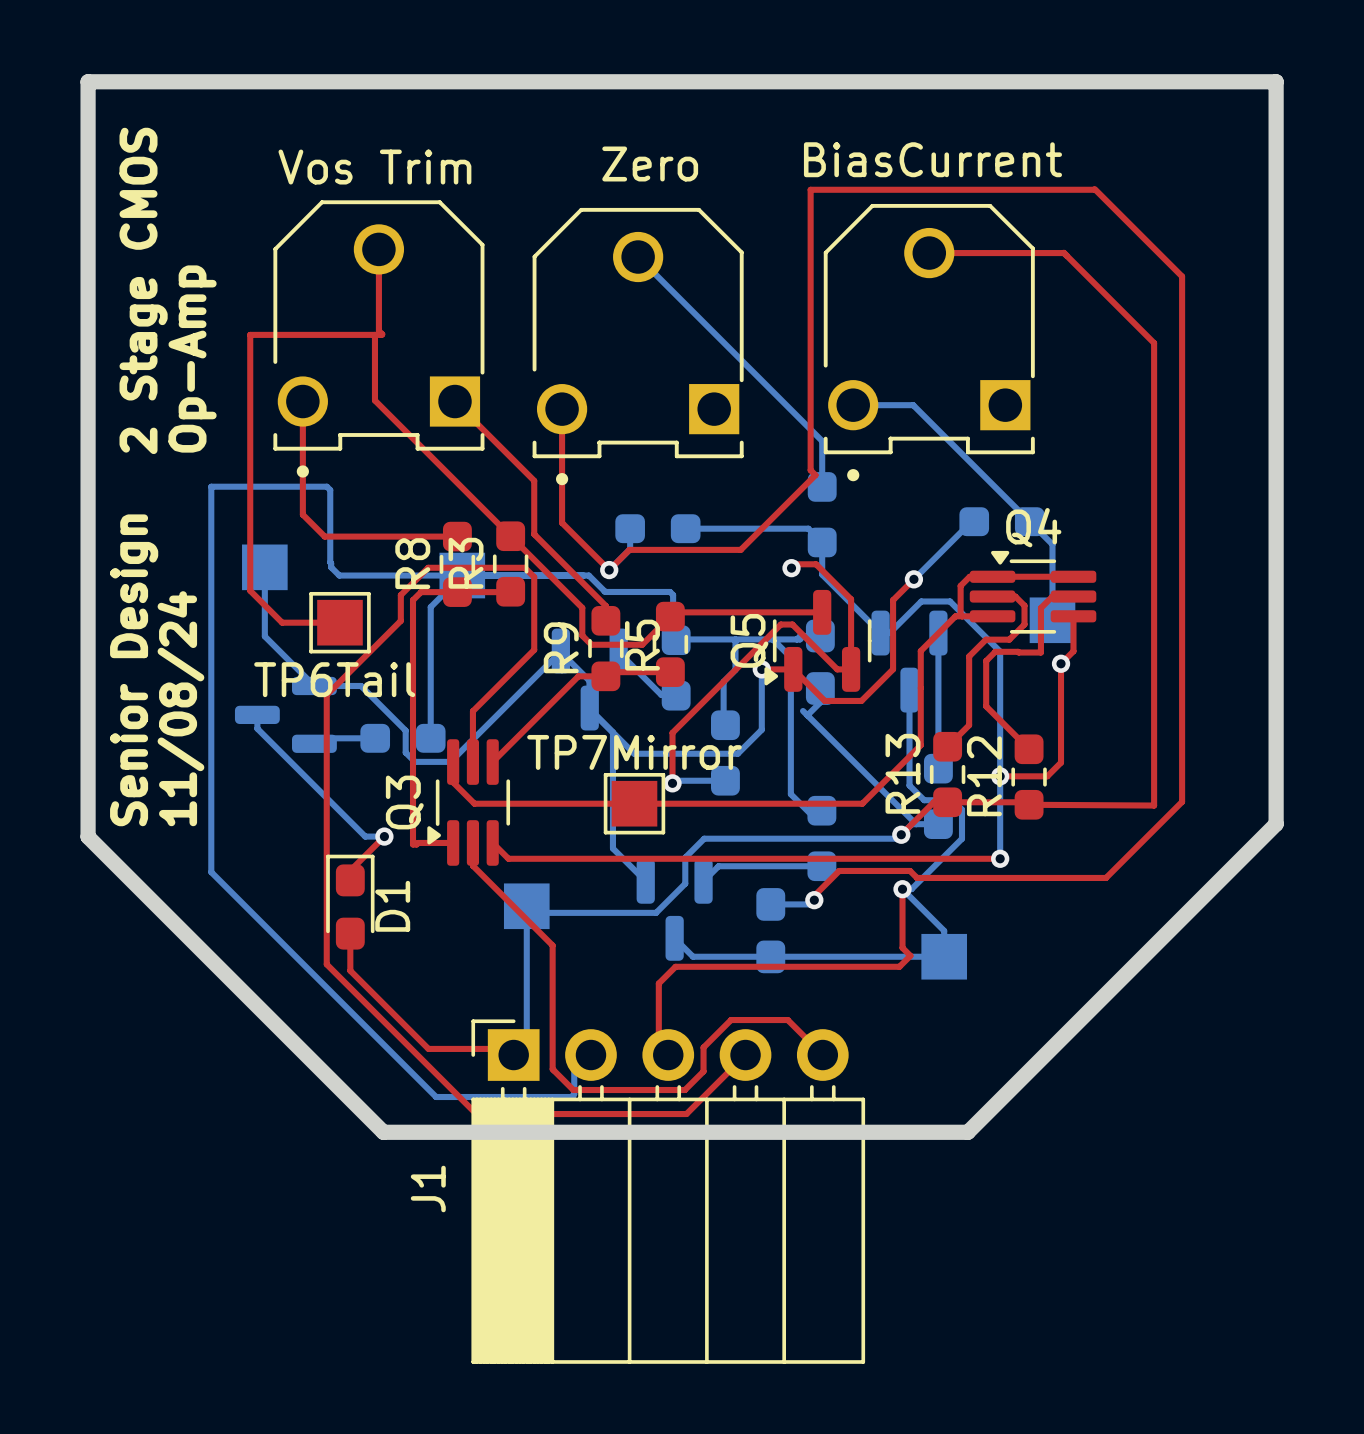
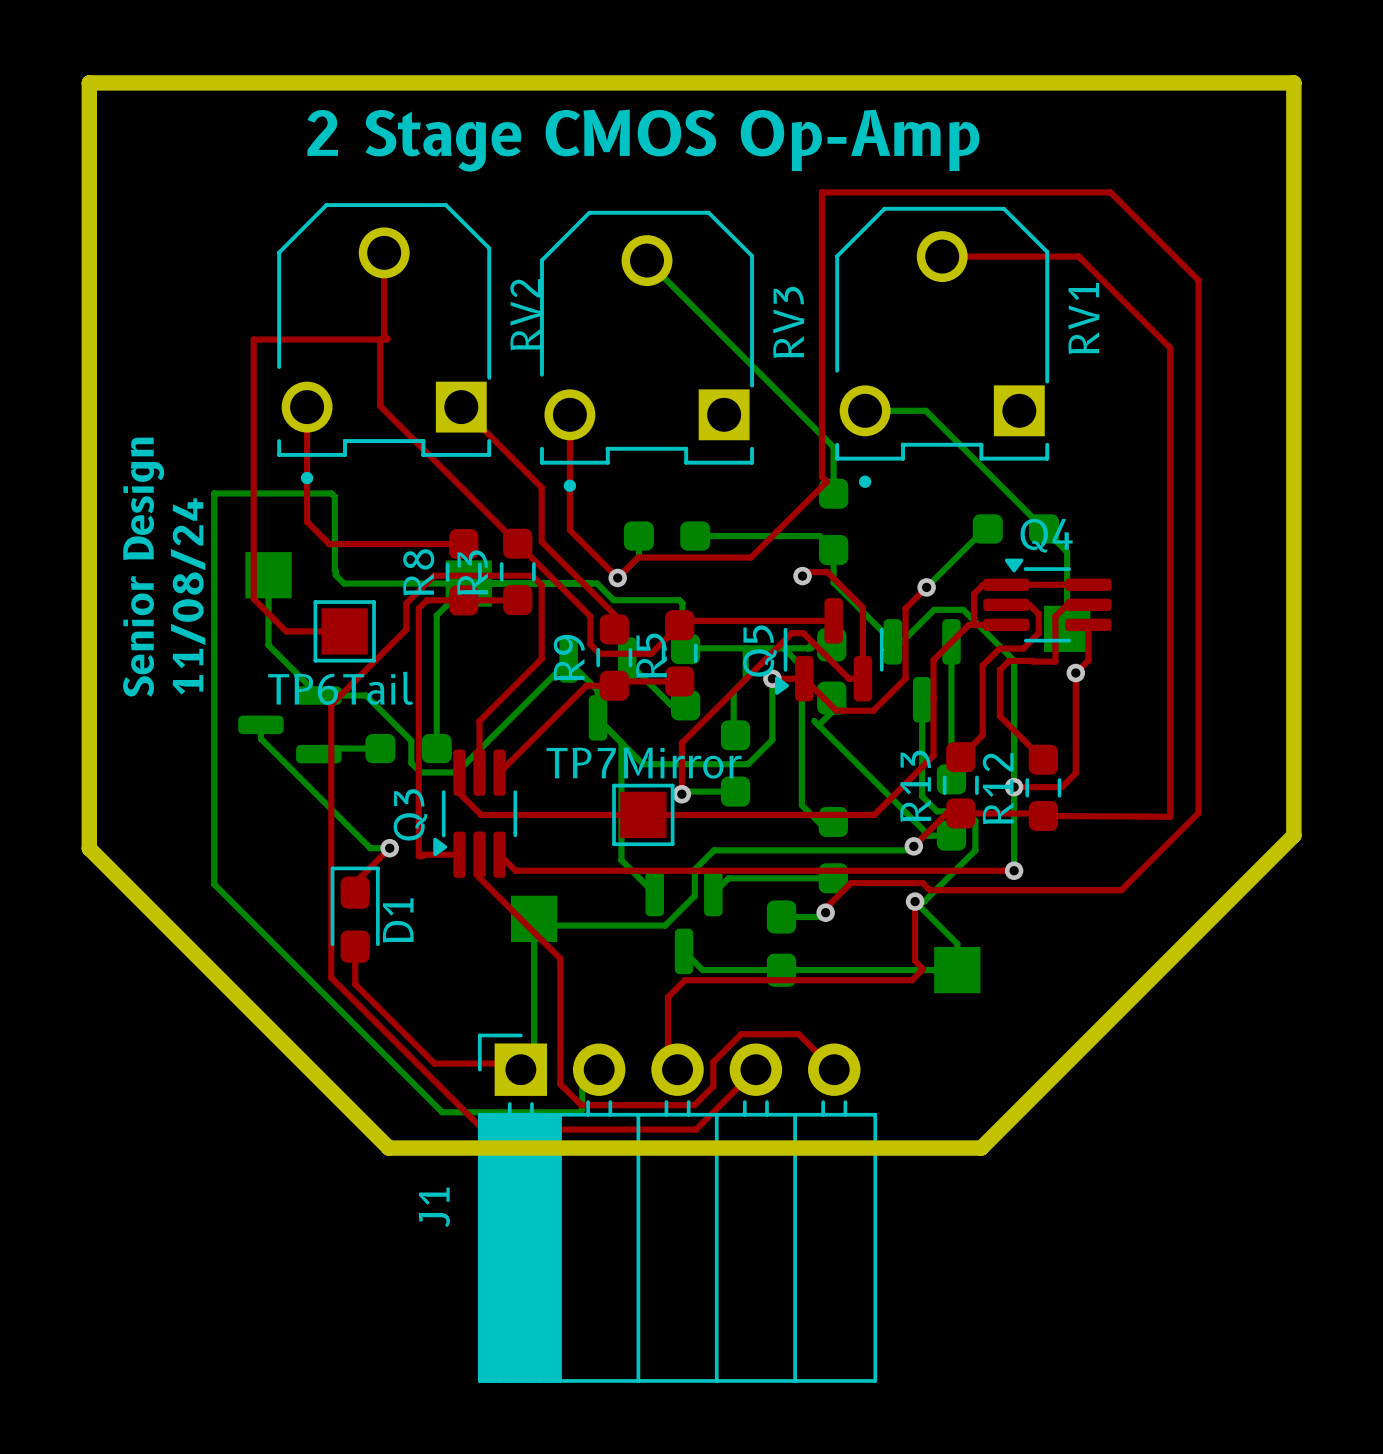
text: none -> 2 Stage CMOS Op-Amp (643, 140)
BiasCurrent name: BiasCurrent (932, 159) -> RV1 (1083, 318)
Zero name: Zero (650, 163) -> RV3 (788, 322)
Vos Trim name: Vos Trim (374, 167) -> RV2 (525, 314)
text: 2 Stage CMOS (143, 290) -> none
text: Op-Amp (192, 359) -> none
text position: Senior Design (134, 670) -> Senior Design (143, 567)
text position: 11/08/24 (180, 708) -> 11/08/24 (188, 596)

